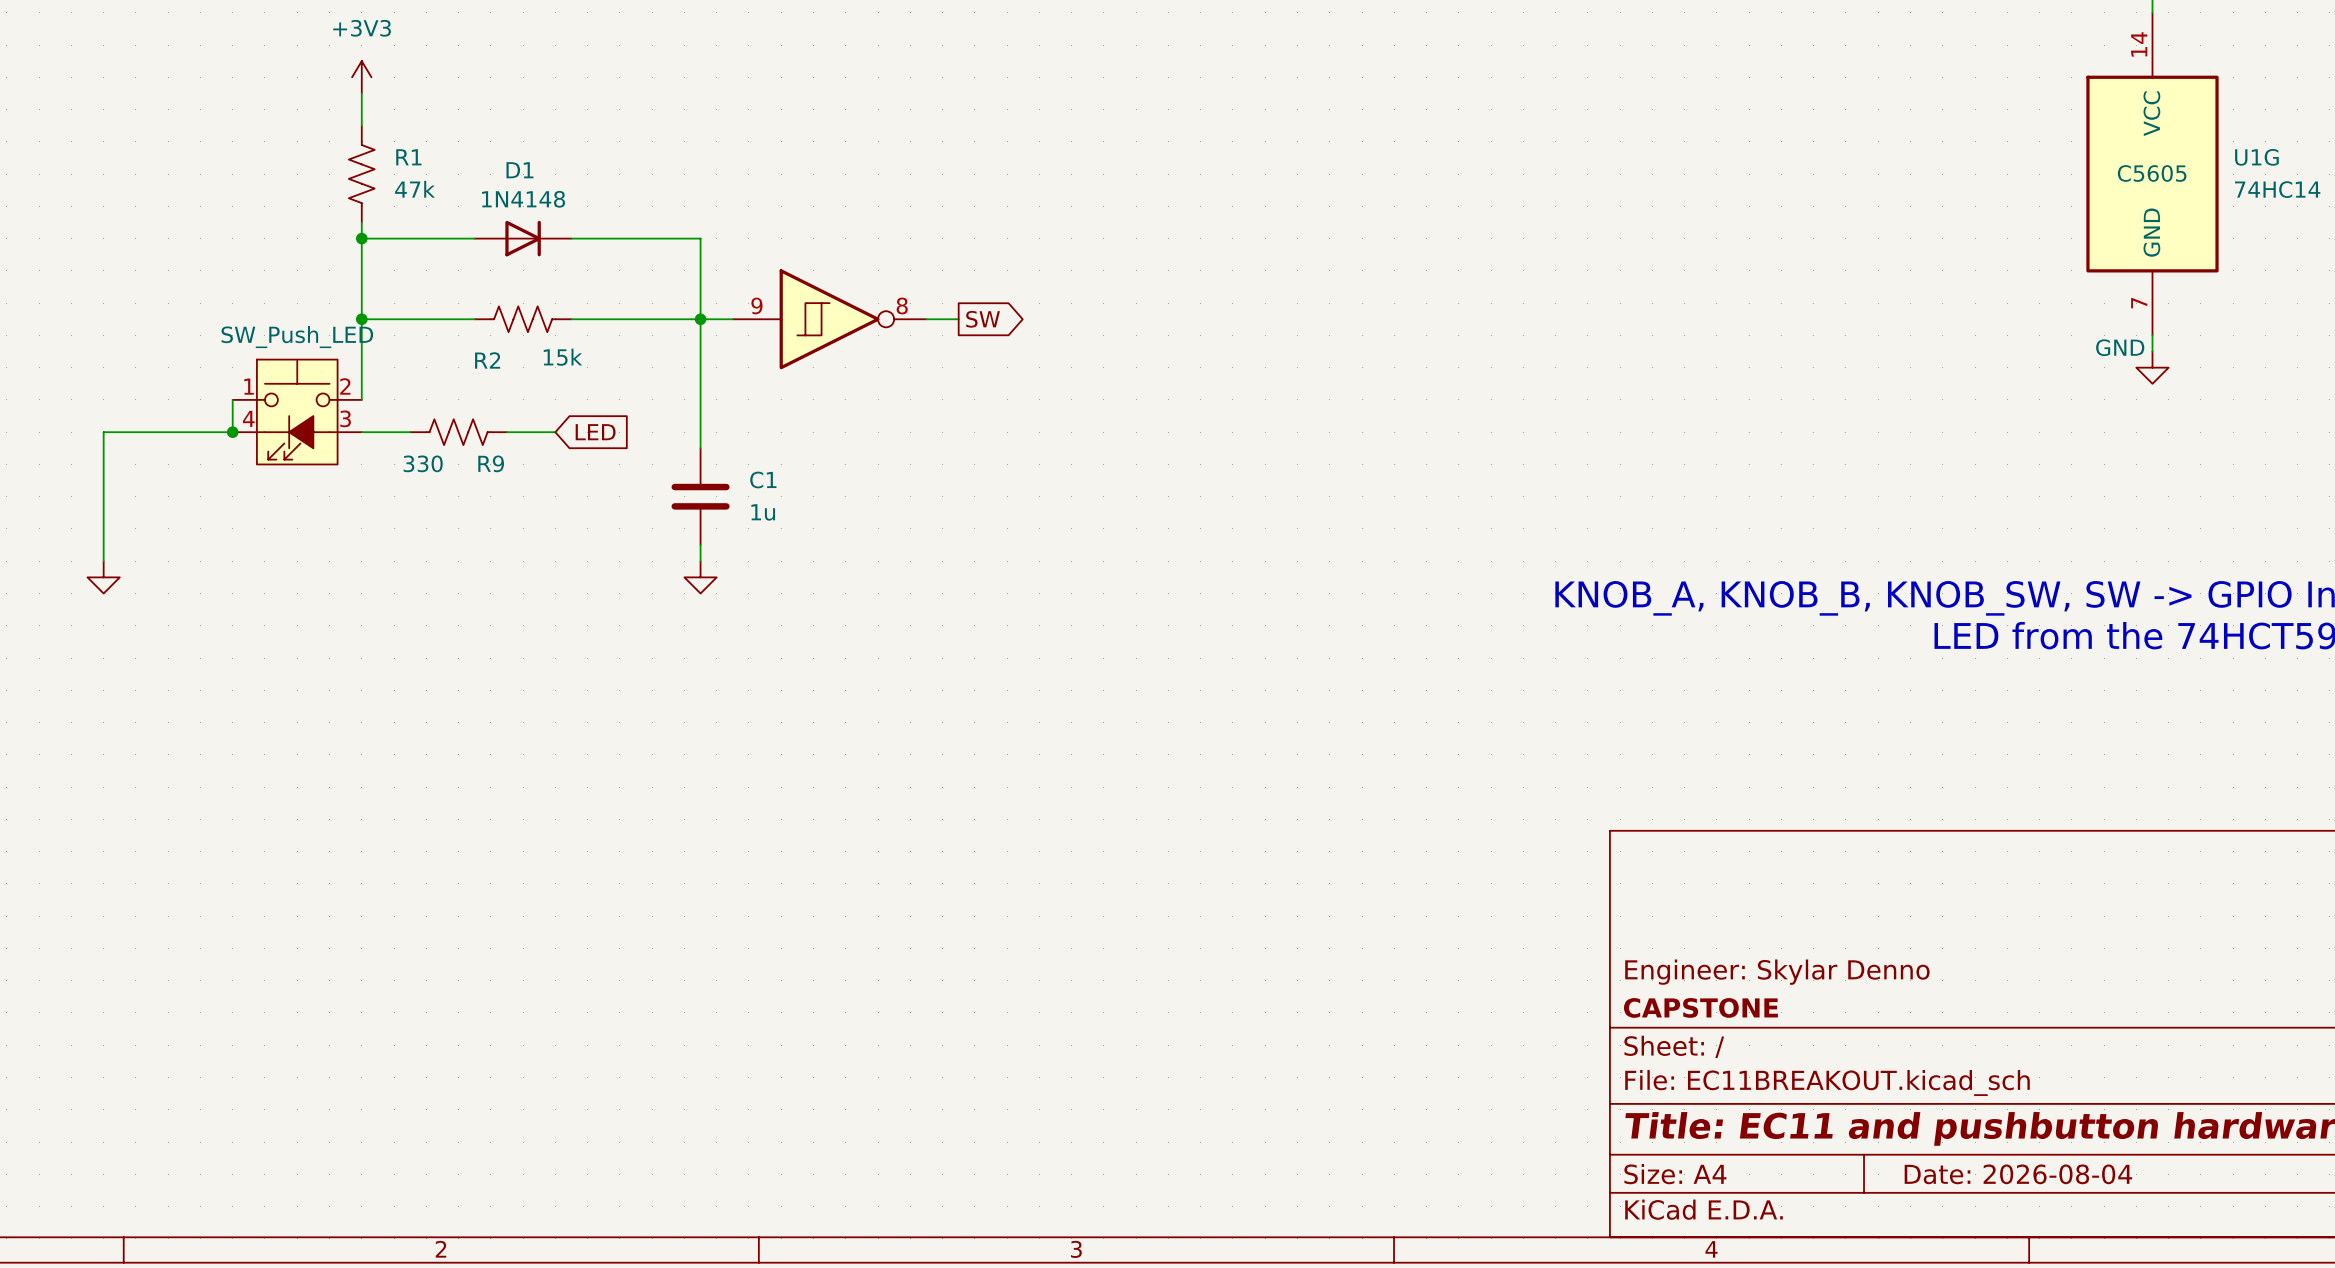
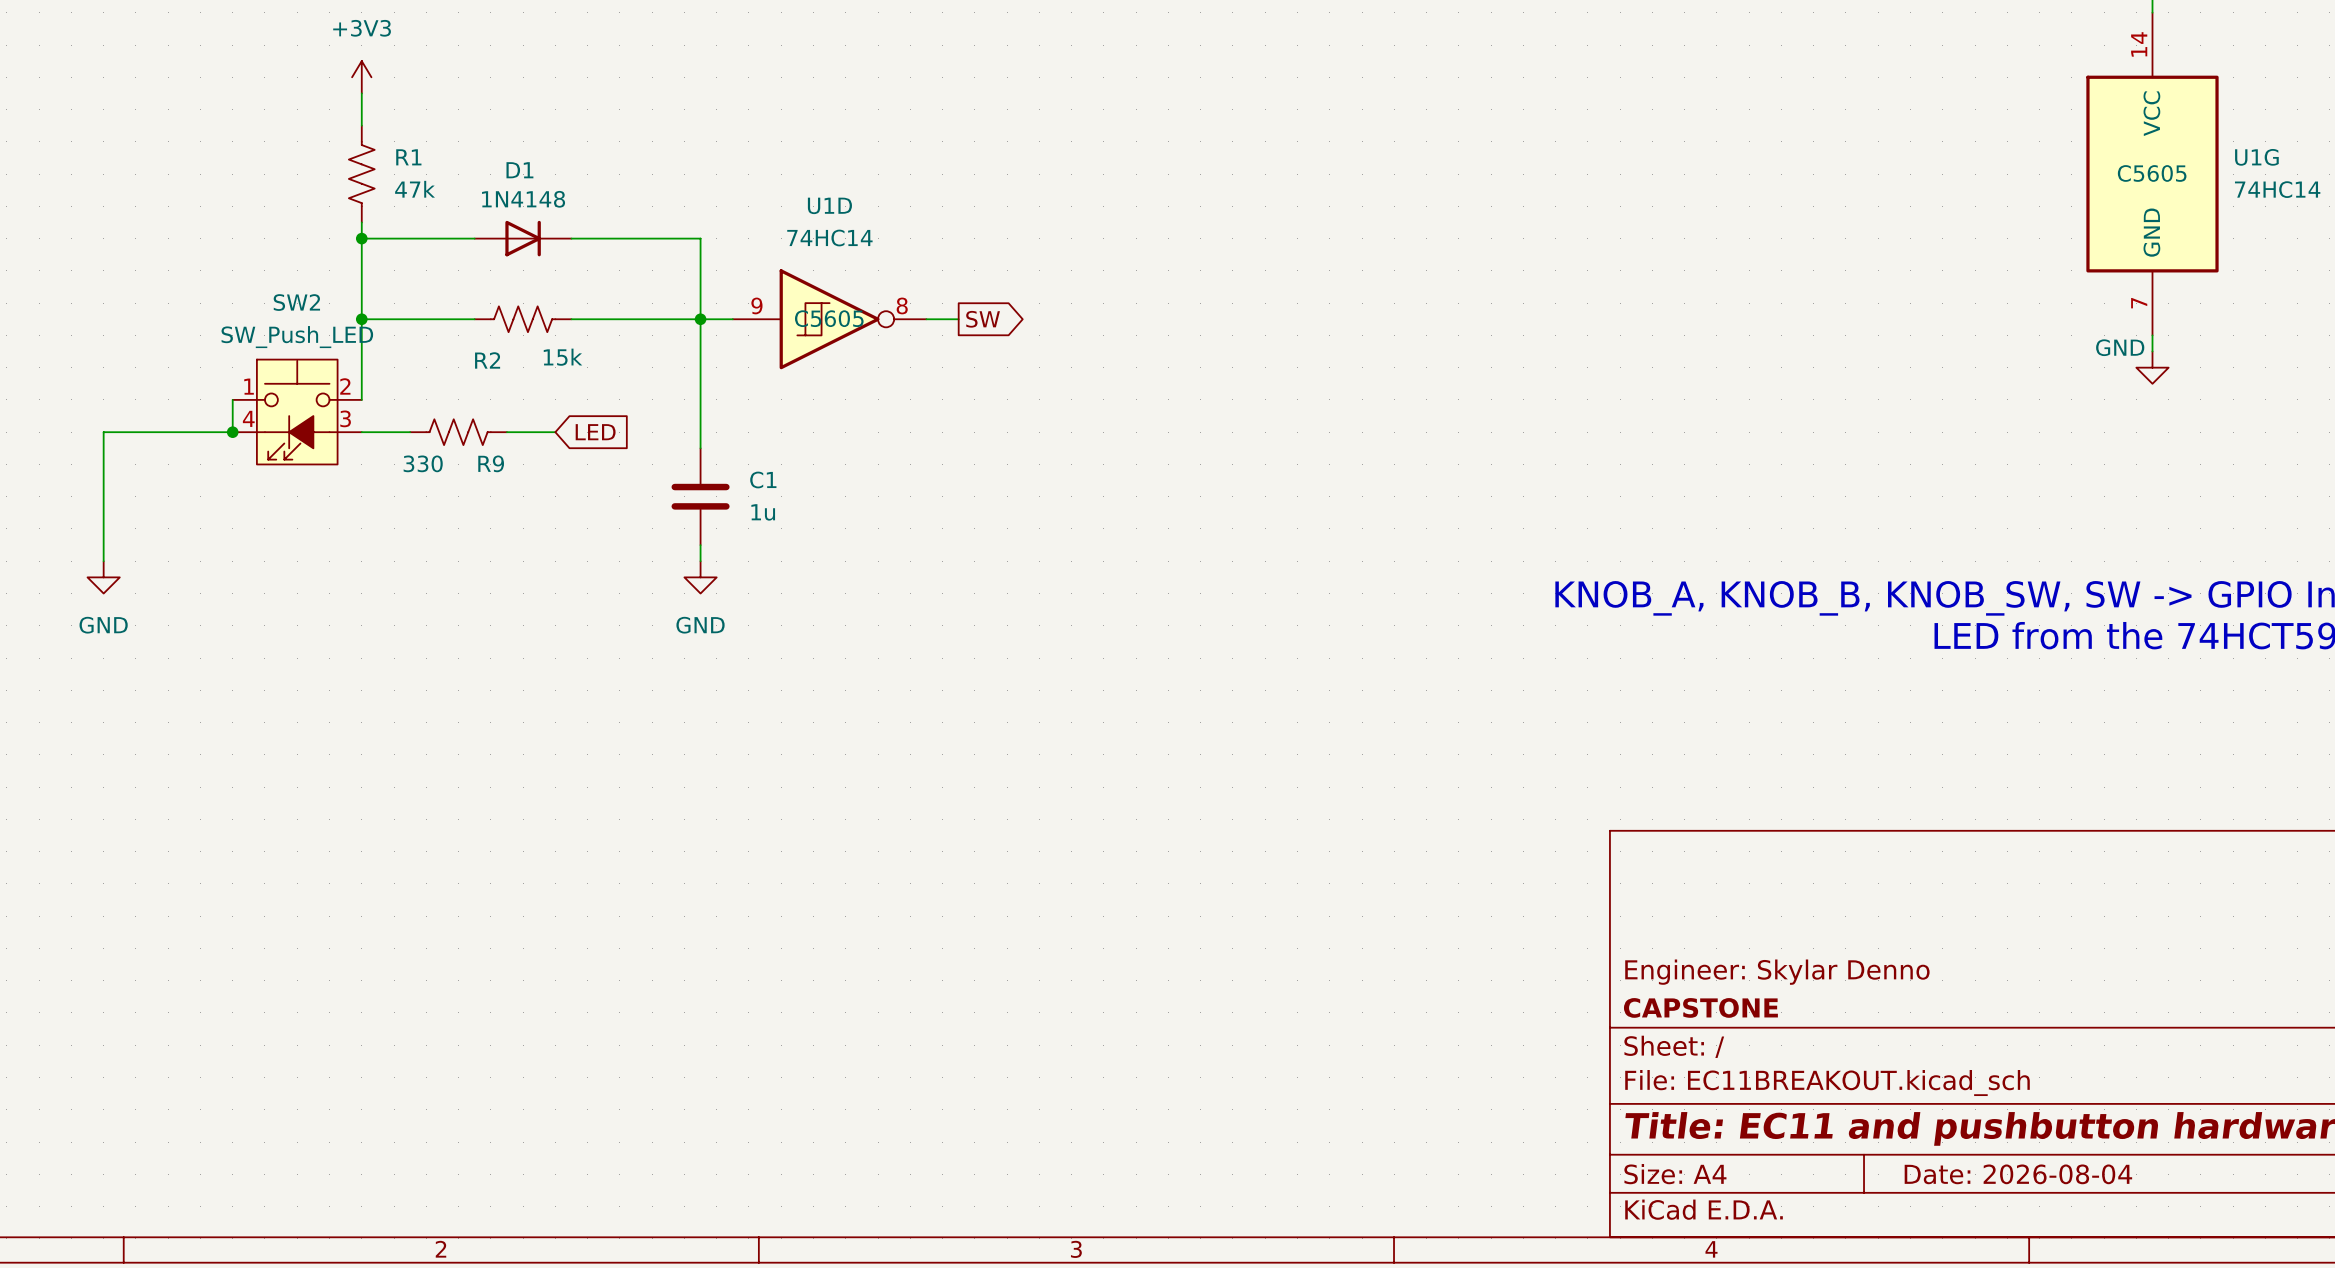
U1D name: none -> U1D (829, 205)
U1D value: none -> 74HC14 (829, 238)
SW2 name: none -> SW2 (296, 302)
U1D text: none -> C5605 (829, 318)
power symbol text: none -> GND (103, 625)
power symbol text: none -> GND (700, 625)

